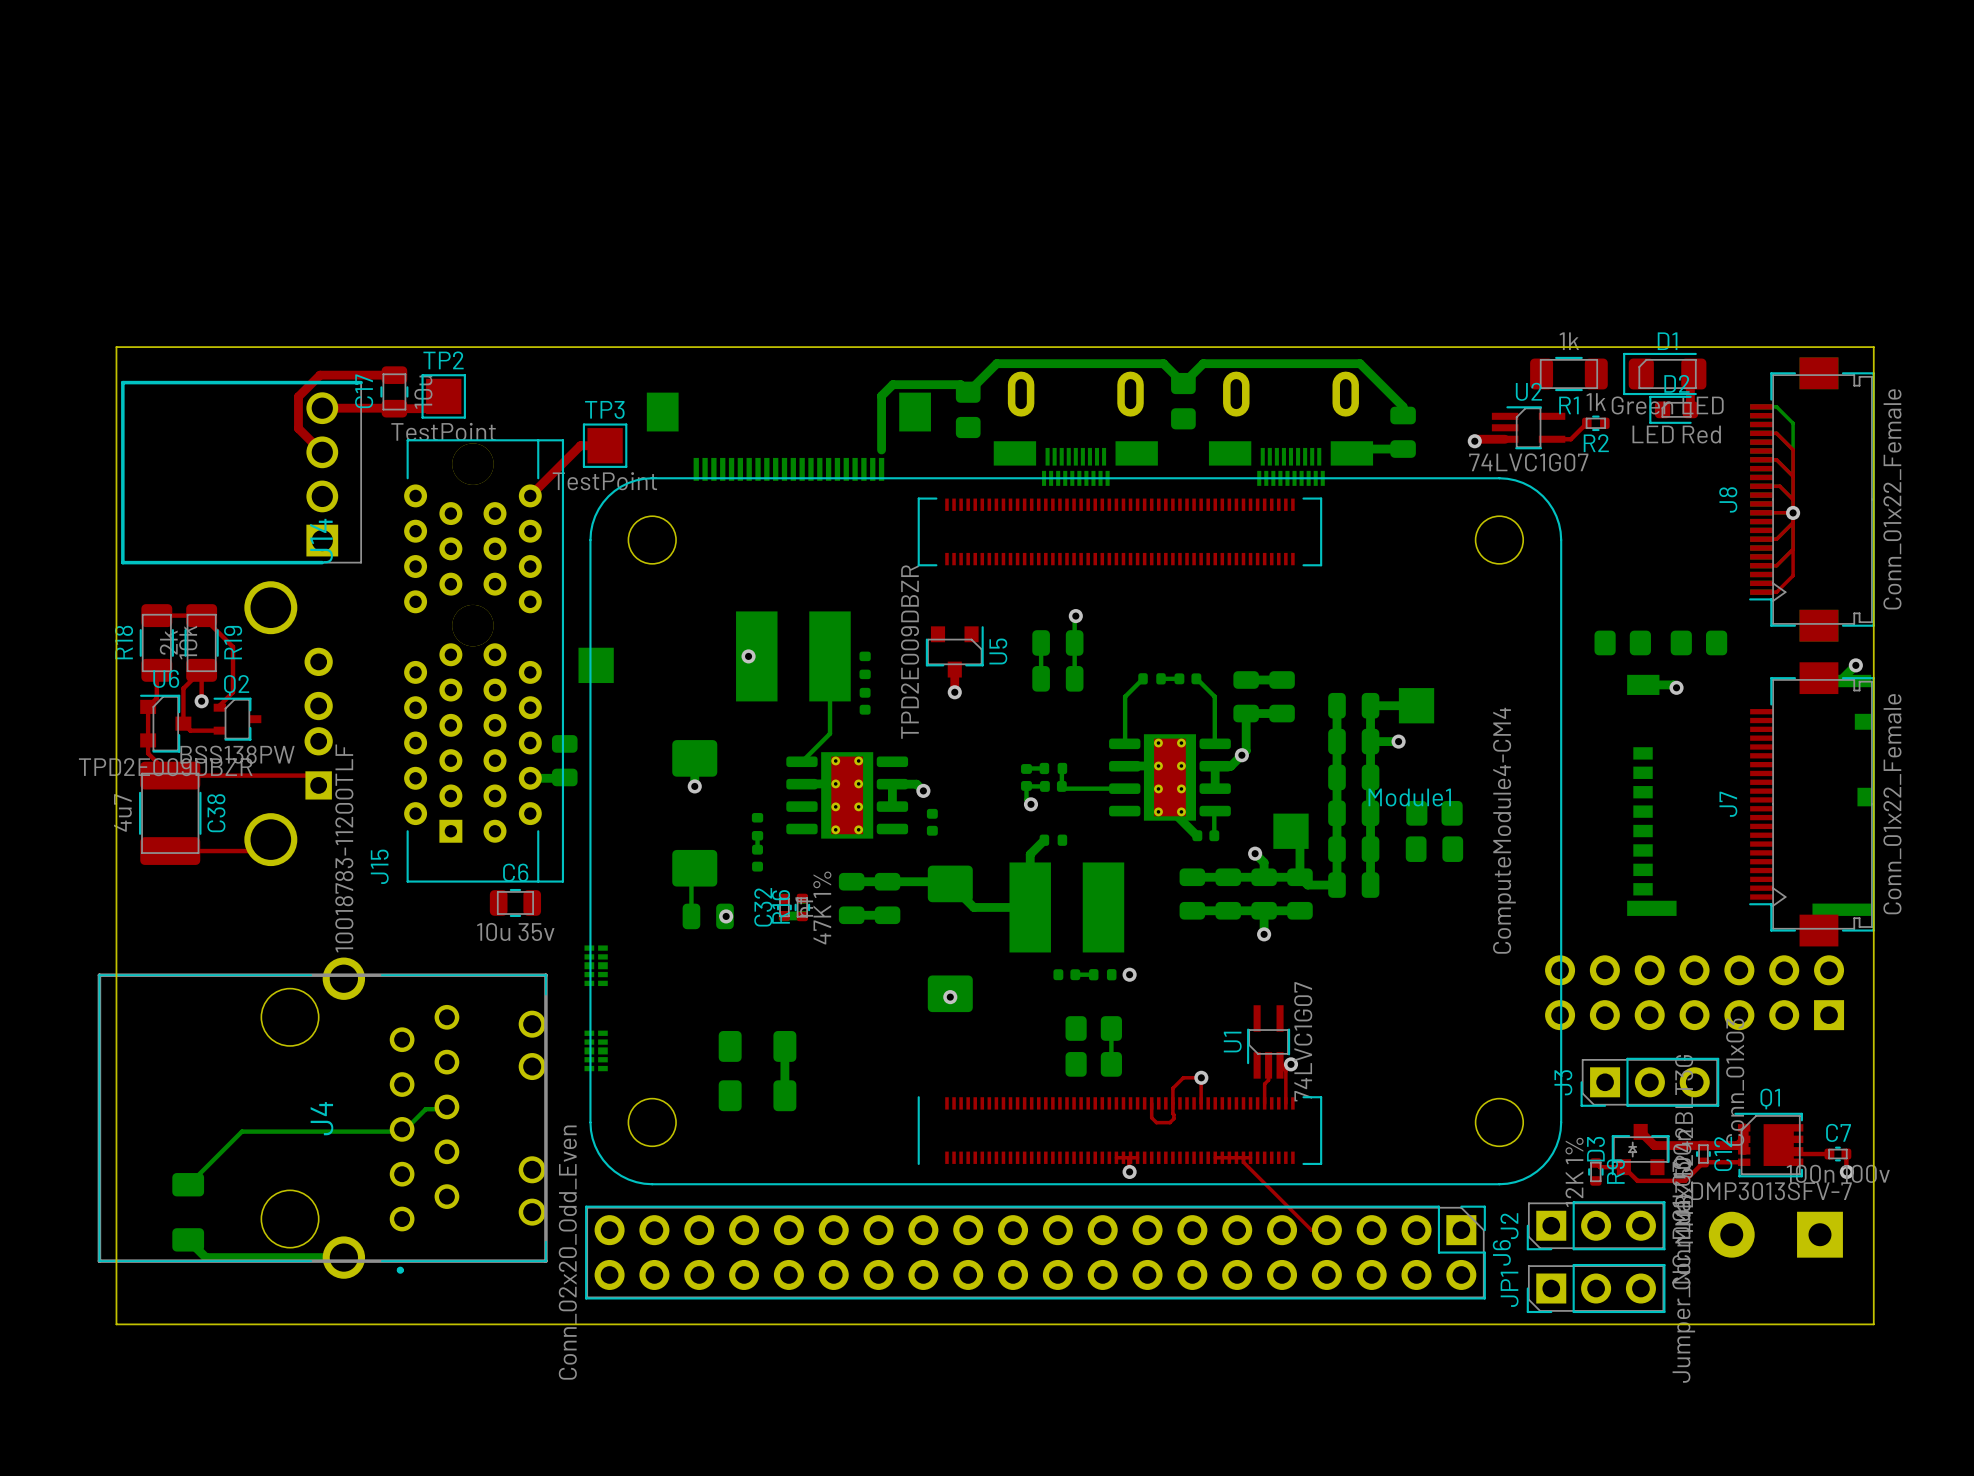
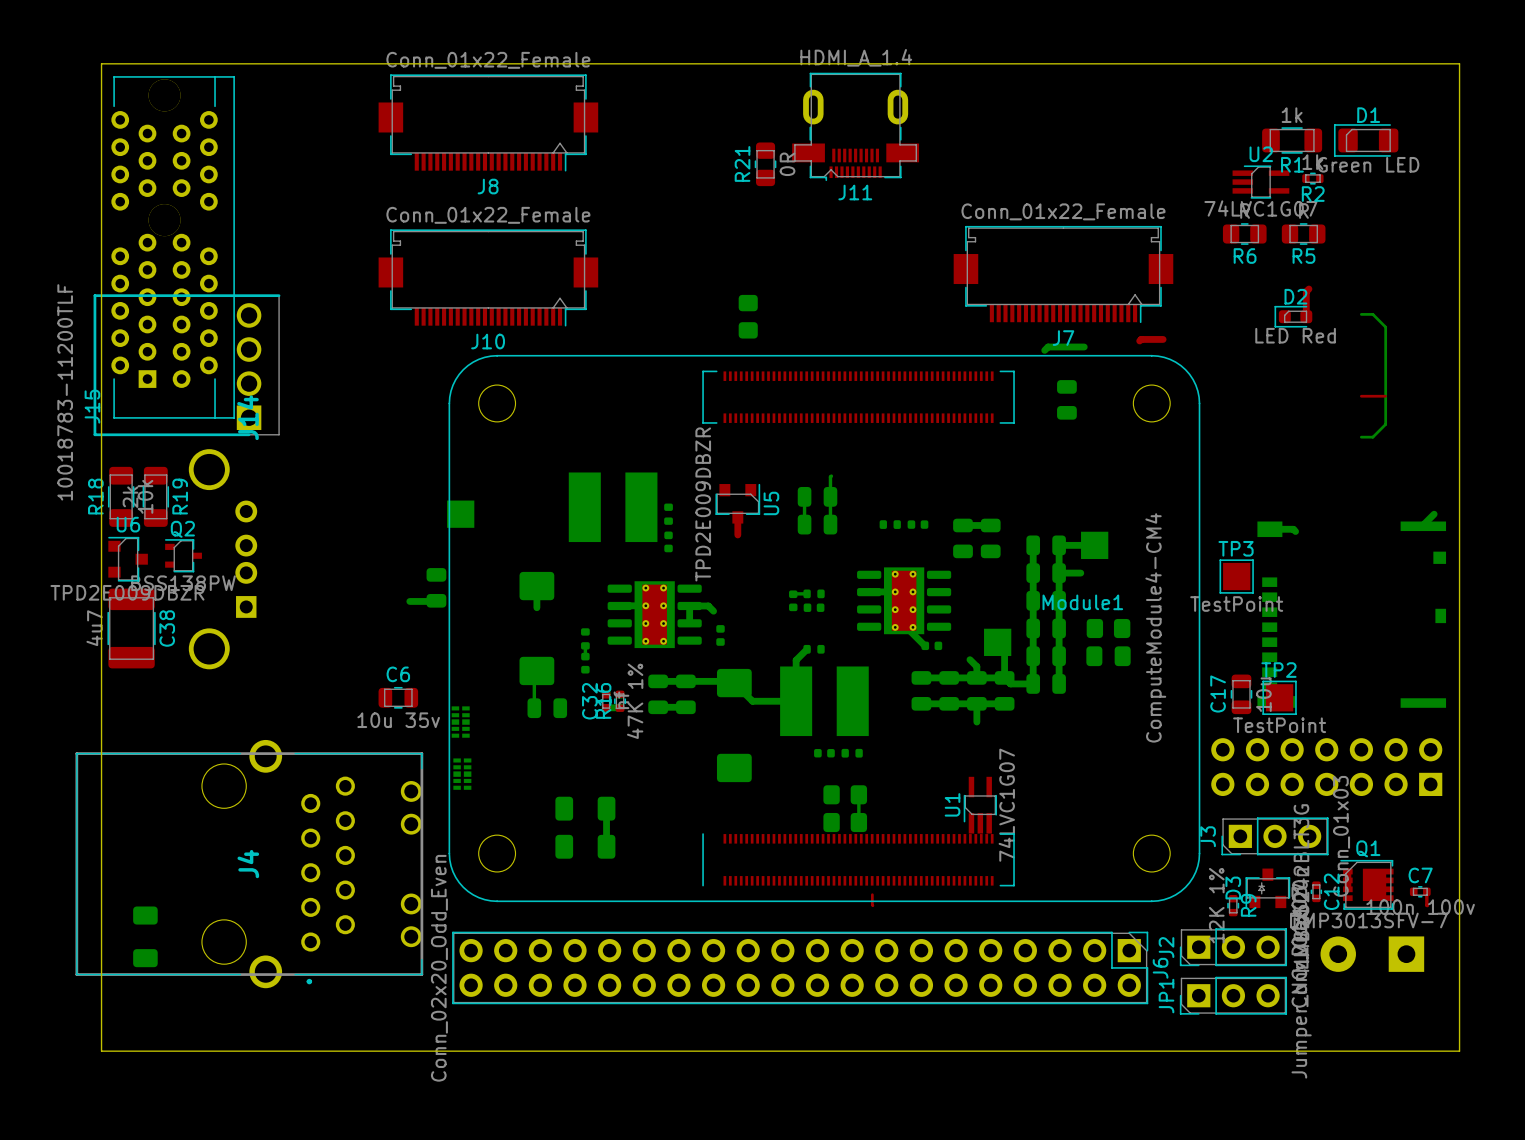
board edge: (116, 347) (1873, 347) (1873, 1324) (116, 1324) (116, 347) -> (101, 63) (101, 1051) (1459, 1051) (1459, 63) (101, 63)
R1 position: (1568, 373) -> (1292, 140)
D1 position: (1664, 373) -> (1366, 140)
top track: (394, 375) (320, 375) (298, 396) (298, 428) (322, 452) -> none
C17 position: (394, 391) -> (1241, 694)
top track: (443, 396) (431, 408) (322, 408) -> none
TP2 position: (443, 396) -> (1279, 697)
R21 side: bottom (1183, 401) -> top (765, 164)
bottom track: (1403, 415) (1403, 406) (1360, 363) (1203, 363) (1183, 383) (1163, 363) (996, 363) (968, 392) (960, 384) (892, 384) (881, 395) (881, 449) -> none
top track: (1586, 423) (1570, 439) (1552, 439) -> none
R2 position: (1595, 423) -> (1312, 178)
U2 position: (1528, 427) -> (1260, 182)
J11 side: bottom (1075, 428) -> top (855, 126)
part: (1291, 428) -> none
part position: (1403, 432) -> (1066, 399)
top track: (1761, 433) (1776, 433) (1793, 449) (1793, 575) (1776, 592) (1761, 592) -> none
J10 side: bottom (788, 436) -> top (488, 277)
via: (1474, 441) -> none
top track: (605, 445) (580, 445) (530, 495) -> none
TP3 position: (605, 445) -> (1236, 576)
top track: (1761, 459) (1776, 459) (1793, 476) -> none
top track: (1761, 486) (1779, 486) (1793, 499) -> none
J8 rotation: 0° (1811, 499) -> 90° counterclockwise (488, 122)
J8 position: (1811, 499) -> (488, 122)
via: (1793, 512) -> none
top track: (1793, 522) (1776, 539) (1761, 539) -> none
top track: (1793, 549) (1776, 565) (1761, 565) -> none
top track: (156, 615) (201, 615) (233, 646) (233, 692) (219, 707) -> none
via: (1075, 616) -> none
R5 side: bottom (1622, 642) -> top (1303, 234)
R6 side: bottom (1698, 642) -> top (1244, 234)
via: (748, 656) -> none
bottom track: (830, 656) (830, 733) (801, 761) -> none
J15 position: (484, 660) -> (173, 247)
via: (1855, 665) -> none
top track: (156, 670) (156, 698) (148, 706) (148, 753) (170, 775) (308, 775) (318, 785) -> none
bottom track: (1143, 678) (1125, 696) (1125, 746) -> none
bottom track: (1160, 678) (1178, 678) -> none
bottom track: (1196, 678) (1214, 696) (1214, 741) -> none
via: (1676, 687) -> none
via: (954, 692) -> none
top track: (201, 701) (201, 670) (183, 688) (183, 723) (190, 730) (219, 730) -> none
via: (201, 701) -> none
bottom track: (1282, 713) (1246, 713) (1246, 750) (1230, 766) (1215, 766) (1215, 788) -> none
via: (1398, 741) -> none
via: (1241, 755) -> none
bottom track: (1062, 768) (1061, 786) (1064, 788) (1124, 788) -> none
via: (694, 786) -> none
bottom track: (1044, 786) (1026, 785) (1026, 799) (1030, 804) -> none
via: (923, 790) -> none
via: (1030, 804) -> none
J7 rotation: 0° (1811, 804) -> 90° counterclockwise (1063, 274)
J7 position: (1811, 804) -> (1063, 274)
bottom track: (1215, 811) (1214, 835) -> none
Module1 position: (1075, 831) -> (824, 628)
top track: (270, 839) (259, 851) (170, 851) -> none
via: (1255, 853) -> none
via: (726, 916) -> none
part: none -> (460, 722)
via: (1264, 934) -> none
part: (596, 965) -> none
bottom track: (1075, 974) (1093, 974) -> none
via: (1129, 974) -> none
part position: (1694, 992) -> (1326, 767)
via: (950, 997) -> none
part: none -> (462, 774)
part: (596, 1050) -> none
top track: (1291, 1064) (1280, 1065) (1285, 1071) (1285, 1103) -> none
via: (1291, 1064) -> none
top track: (1268, 1065) (1268, 1080) (1264, 1083) (1264, 1103) -> none
top track: (1201, 1077) (1183, 1077) (1172, 1088) (1173, 1118) (1169, 1122) (1156, 1122) (1151, 1117) (1151, 1103) -> none
via: (1201, 1077) -> none
top track: (1201, 1078) (1201, 1103) -> none
bottom track: (448, 1109) (425, 1109) (403, 1131) -> none
bottom track: (398, 1131) (241, 1131) (188, 1185) -> none
top track: (1640, 1131) (1654, 1145) (1737, 1145) (1744, 1139) -> none
top track: (1778, 1145) (1787, 1154) (1829, 1154) -> none
top track: (1116, 1157) (1137, 1157) -> none
top track: (1215, 1157) (1250, 1157) -> none
top track: (1243, 1157) (1243, 1162) (1311, 1230) (1326, 1230) -> none
top track: (1744, 1162) (1703, 1162) (1685, 1180) (1637, 1180) (1623, 1167) (1600, 1167) (1595, 1162) -> none
via: (1129, 1171) -> none
via: (1846, 1171) -> none
bottom track: (188, 1239) (205, 1257) (343, 1257) -> none

